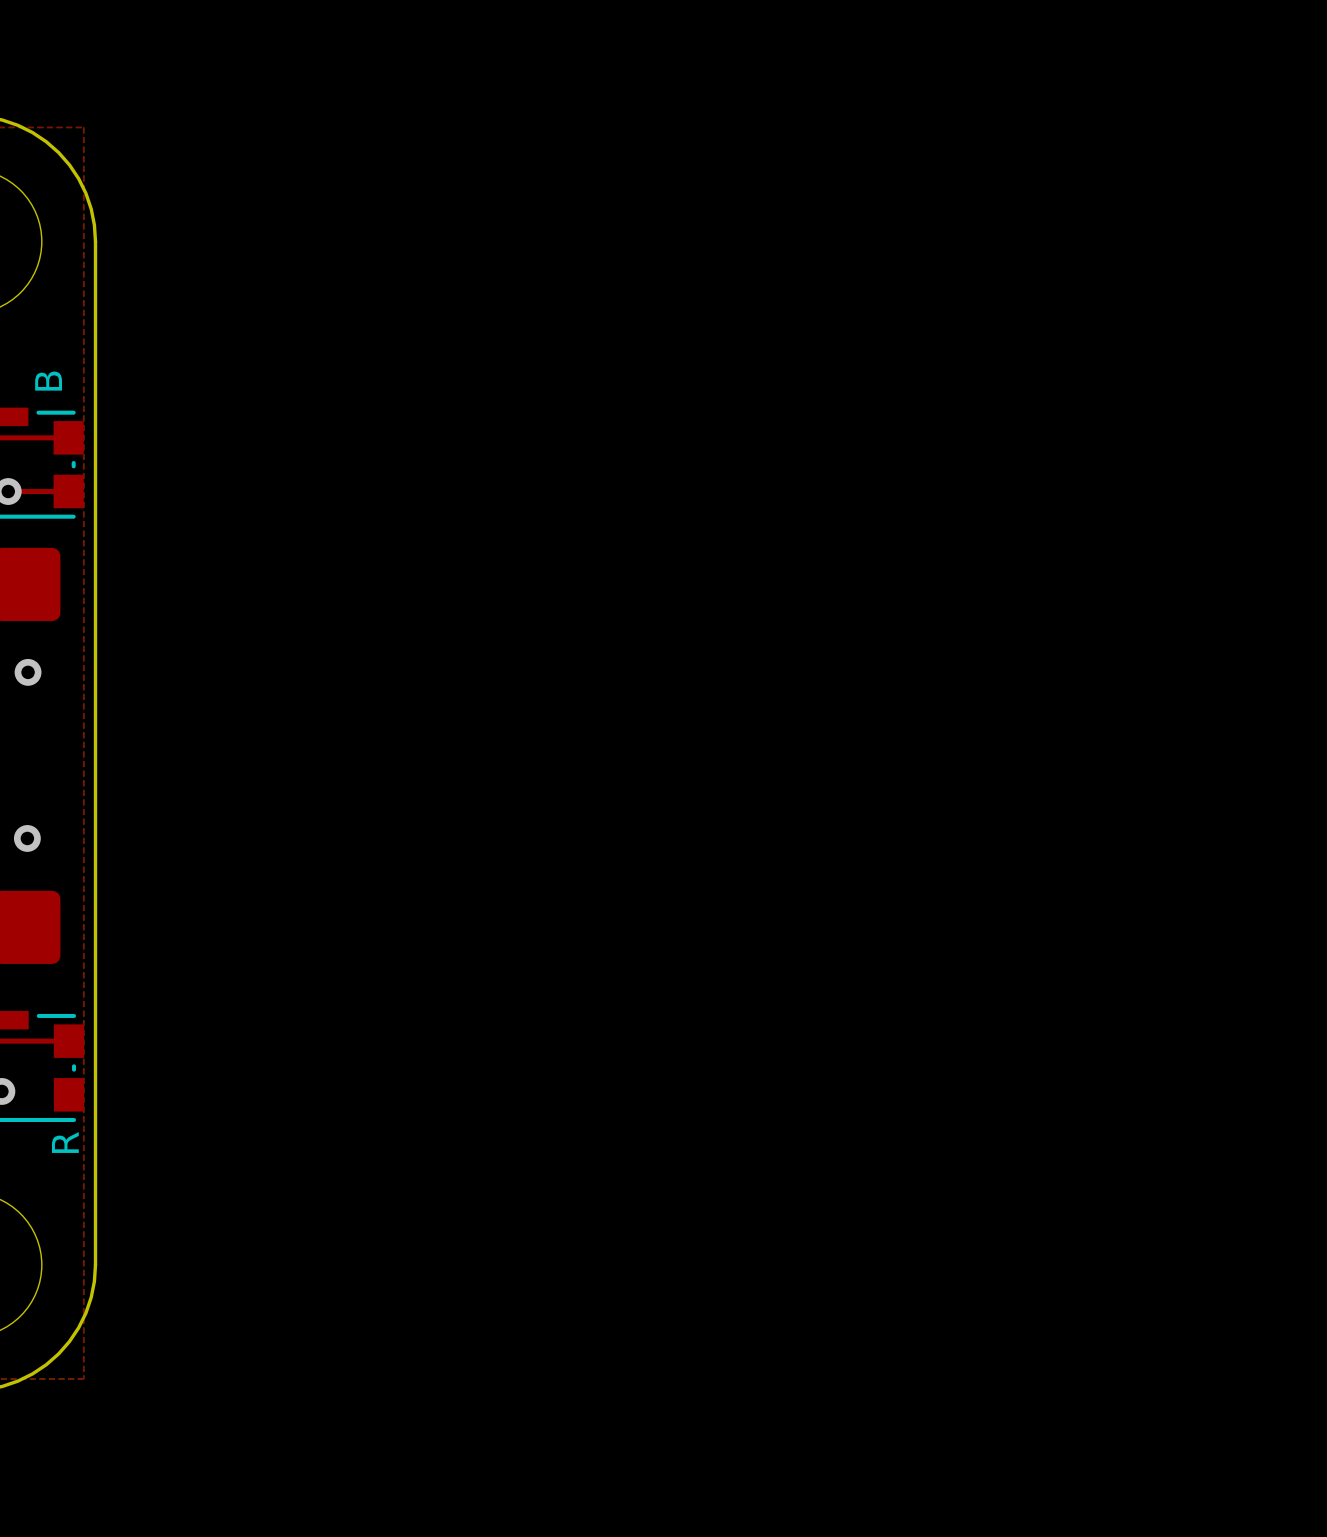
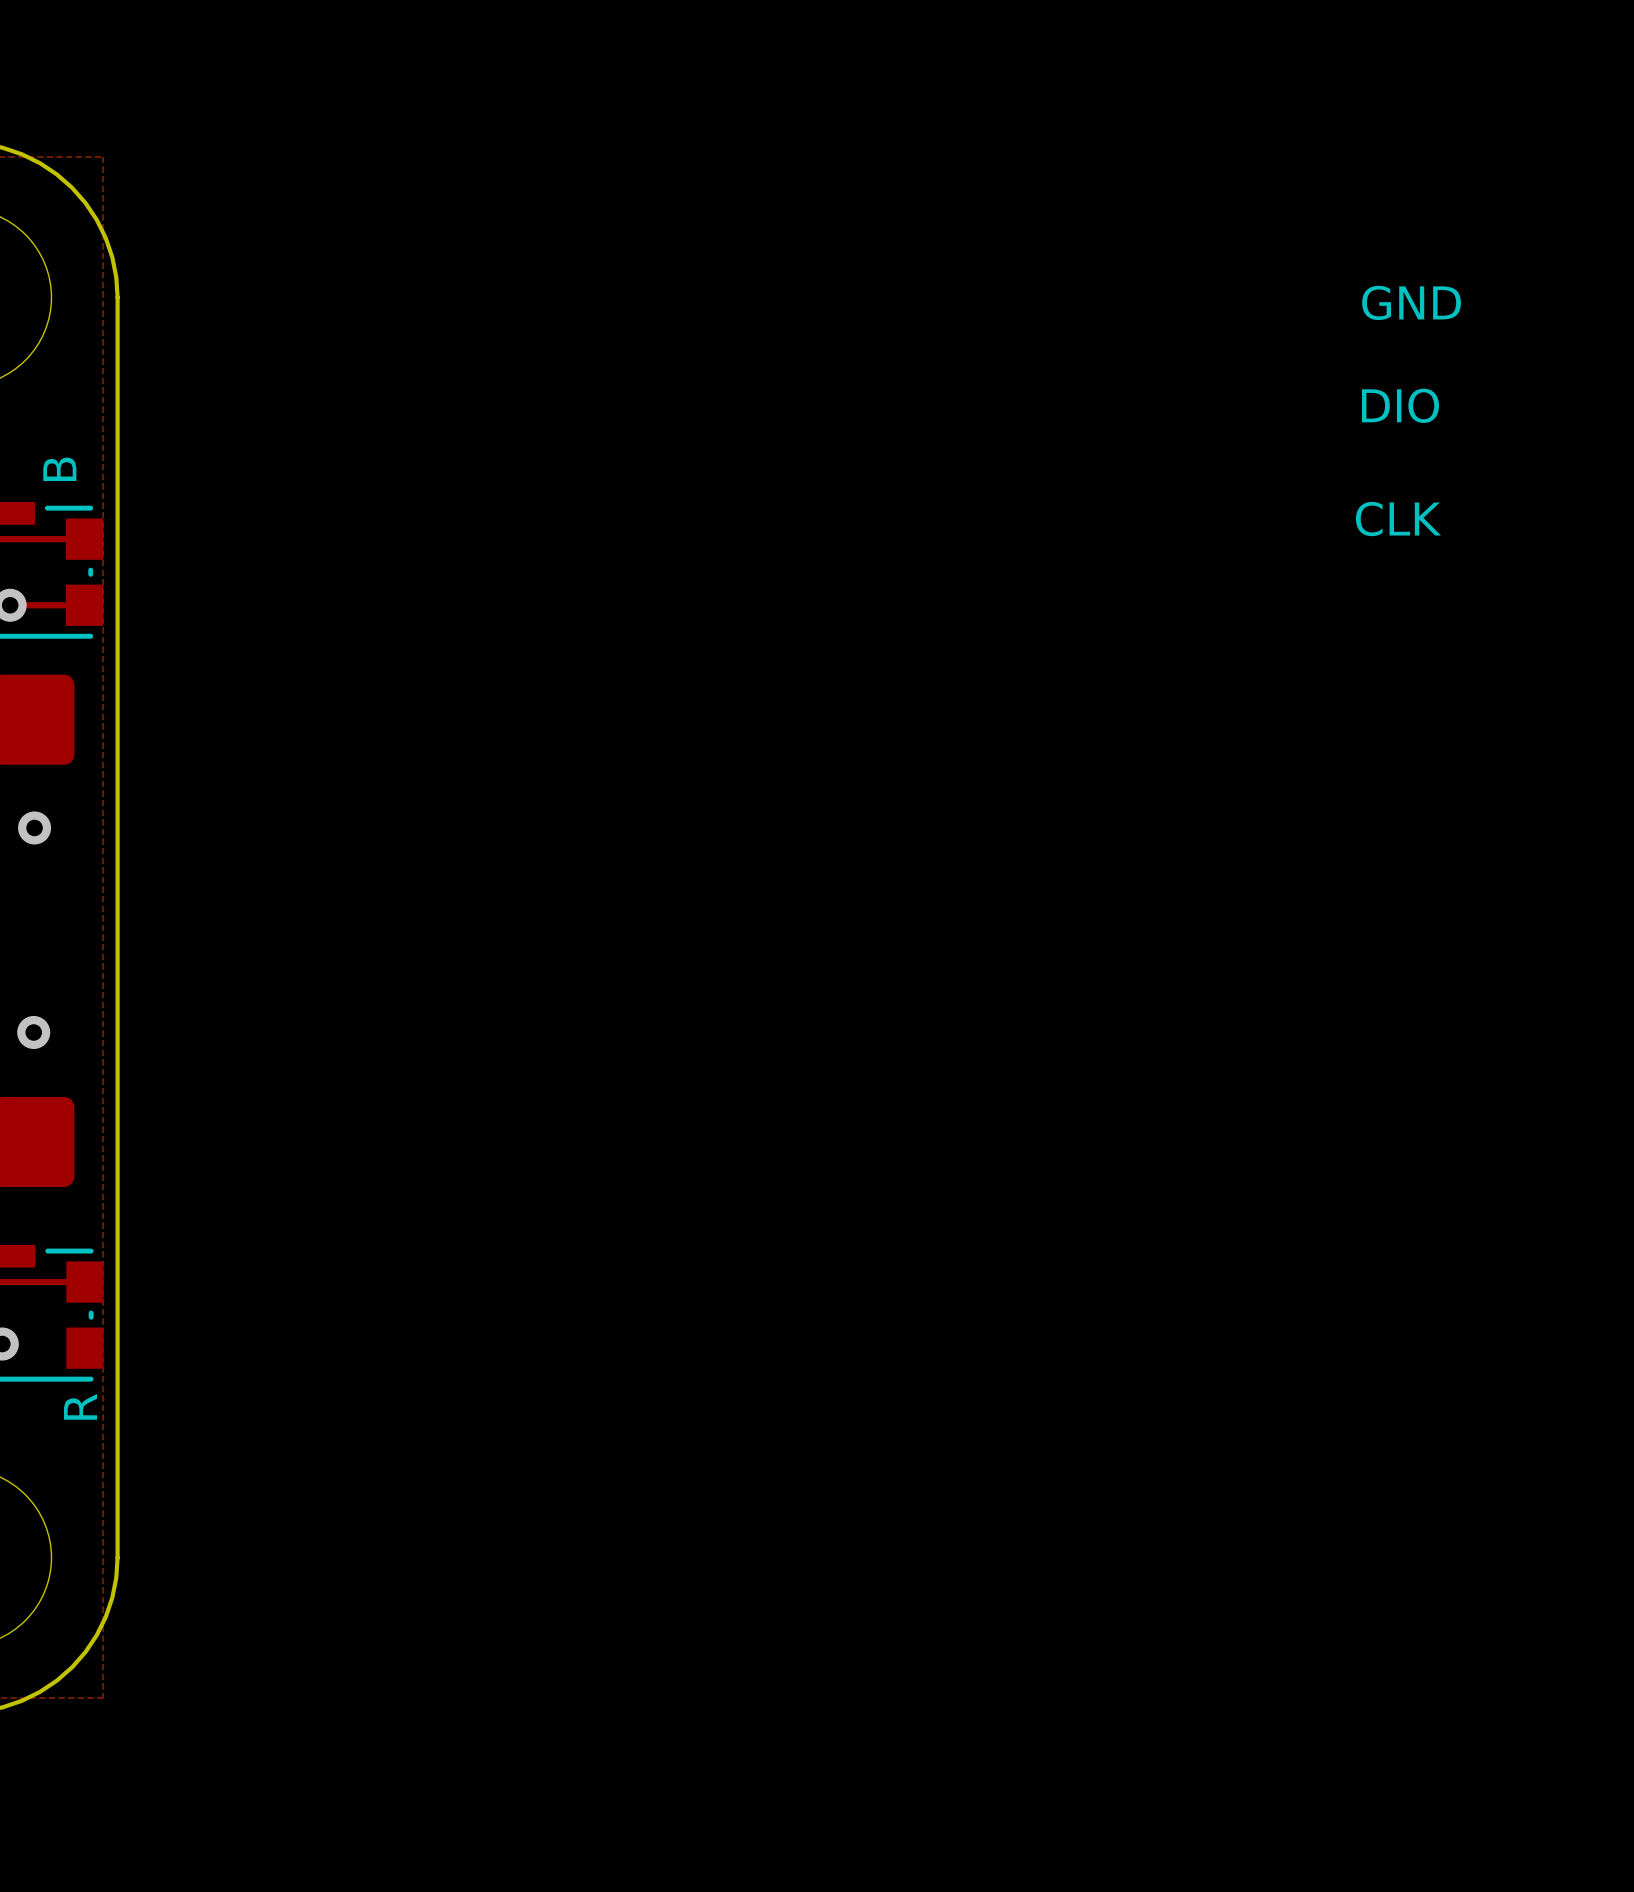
text: none -> GND (1411, 302)
text: none -> DIO (1400, 405)
text: none -> CLK (1398, 519)

